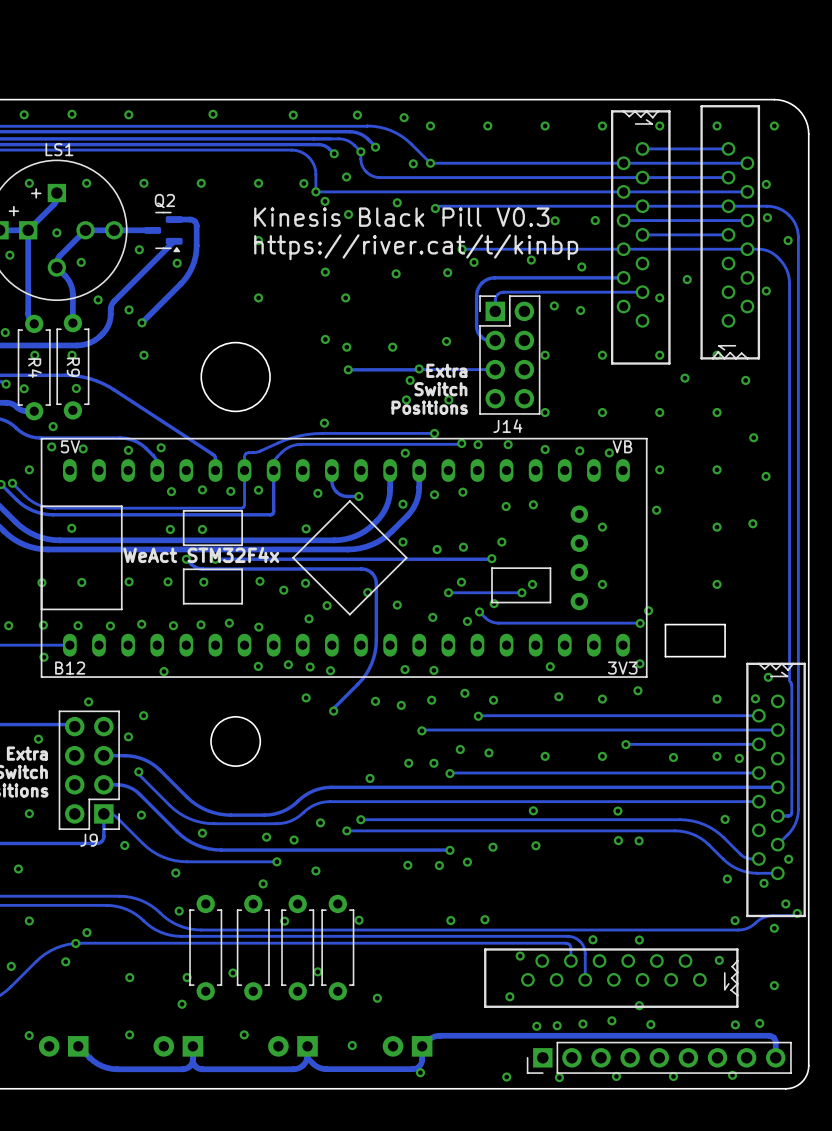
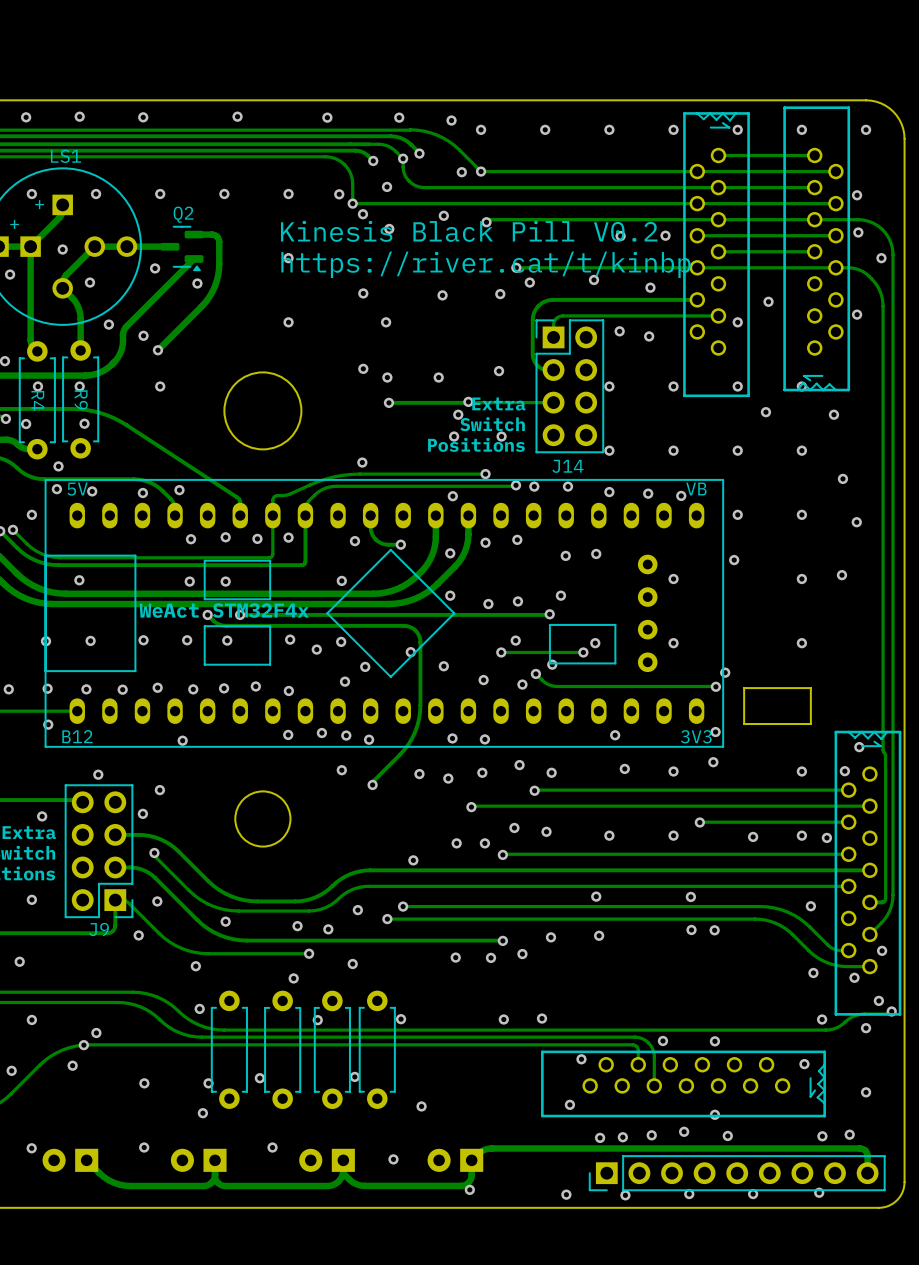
text: Kinesis Black Pill V0.3 (401, 217) -> Kinesis Black Pill V0.2 (469, 231)

